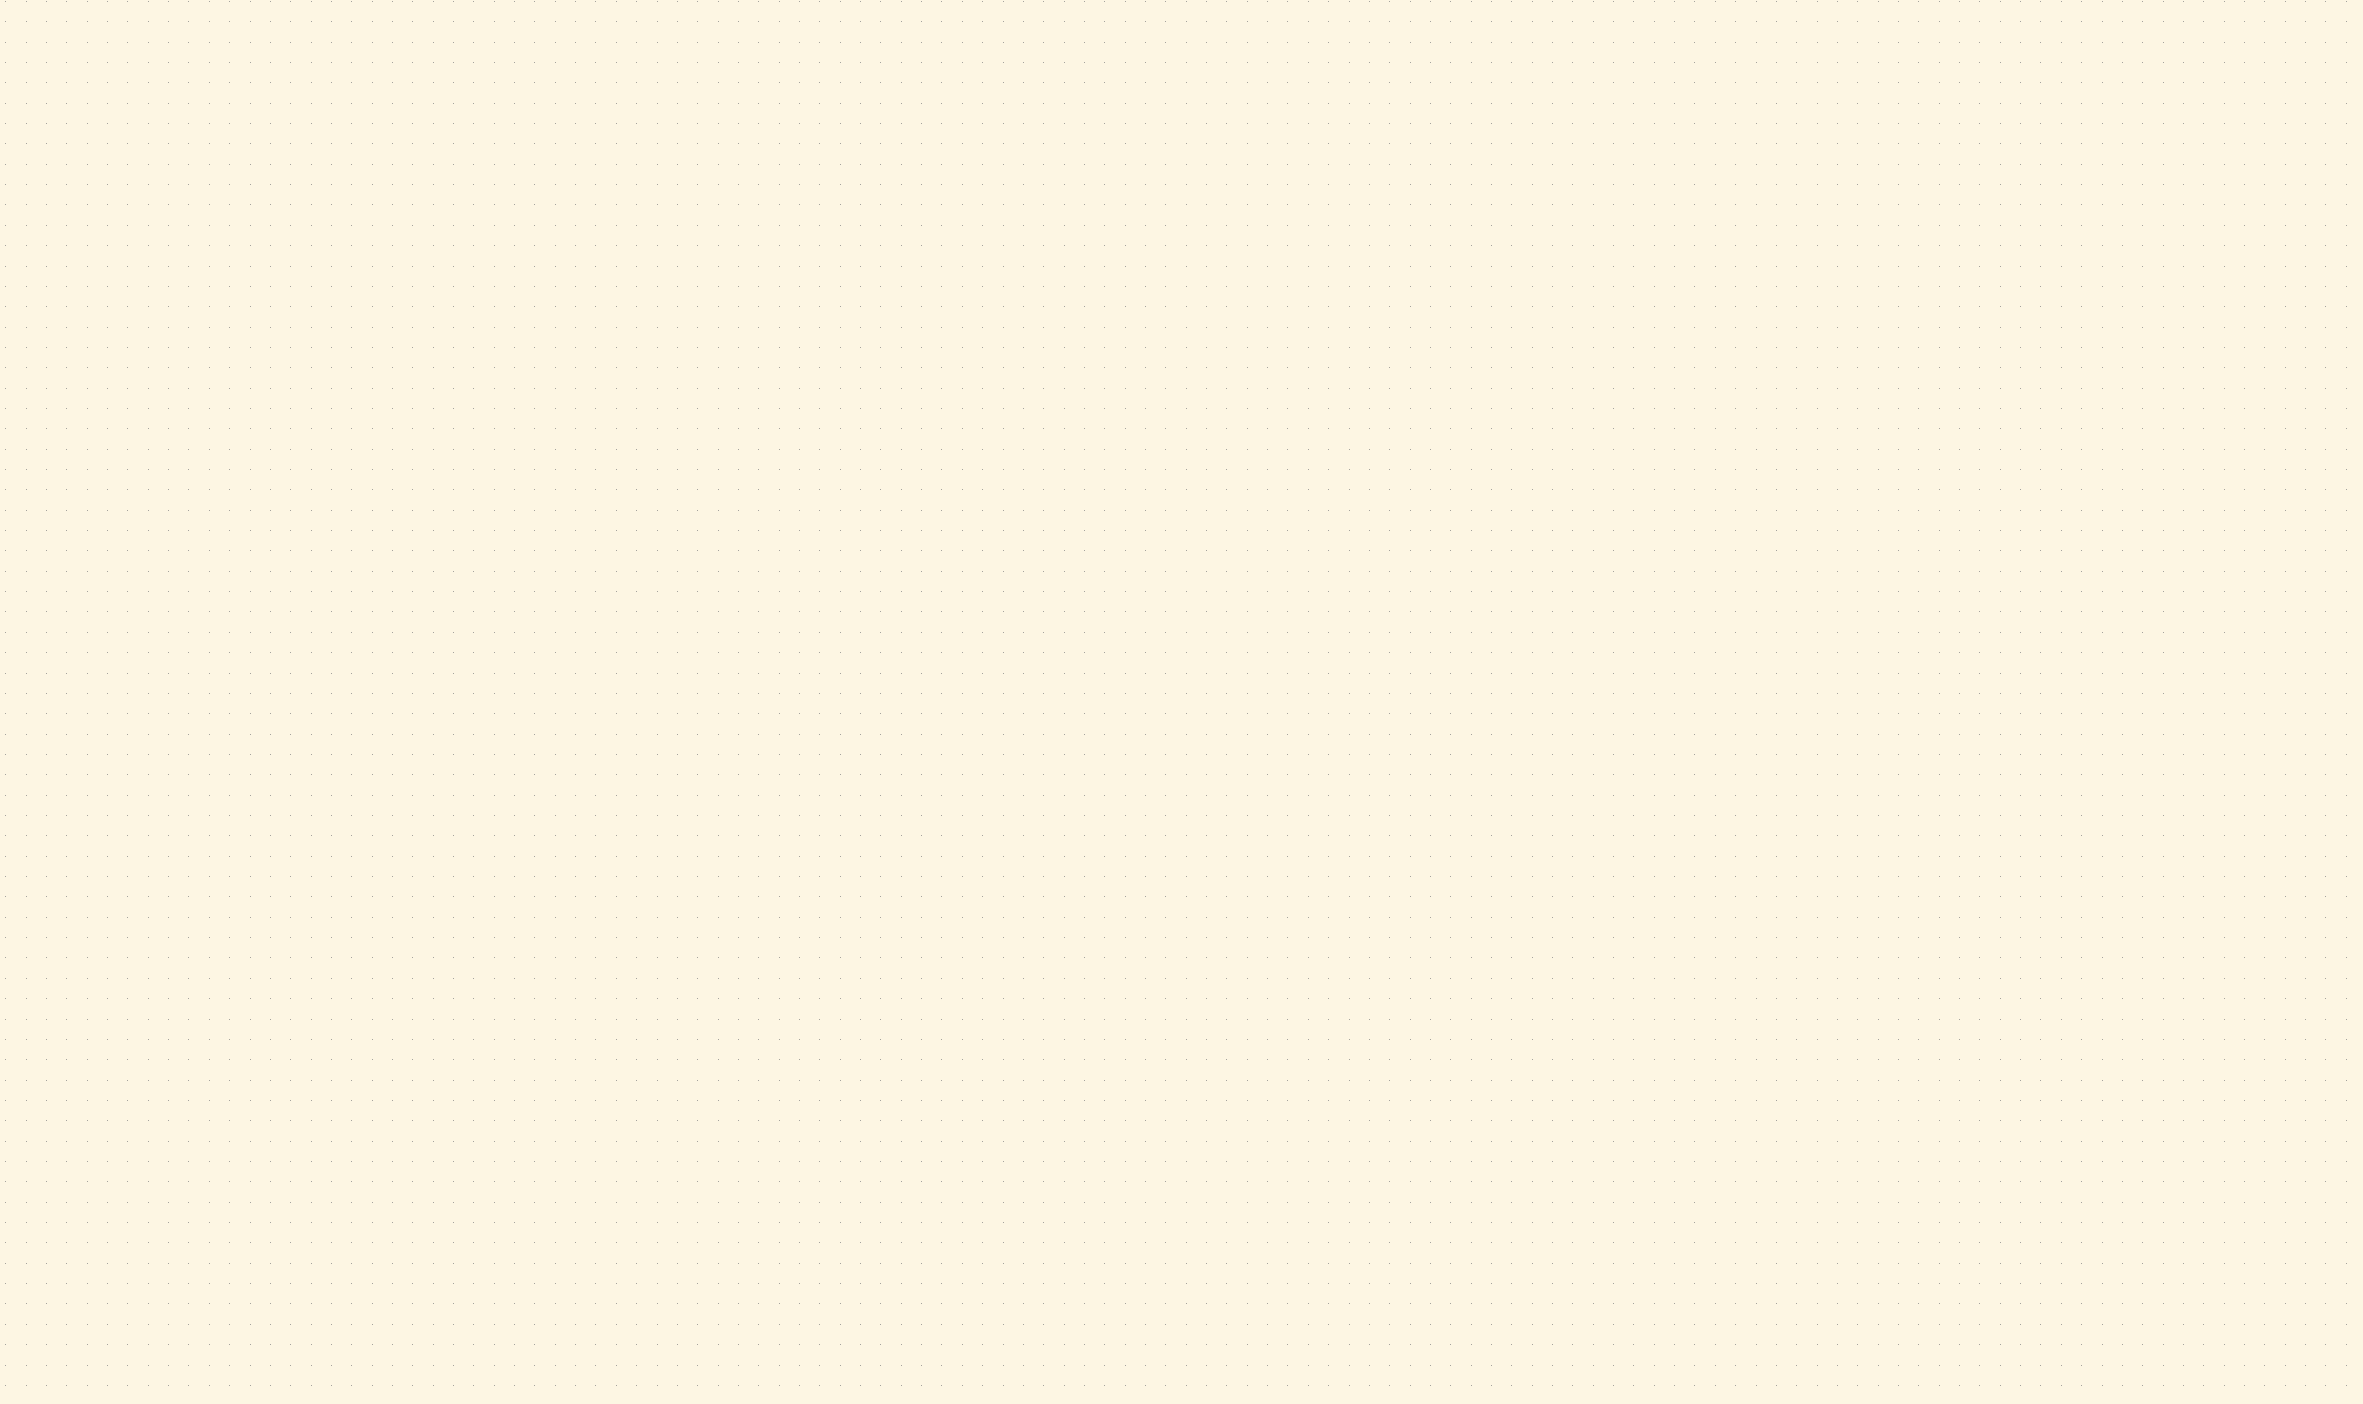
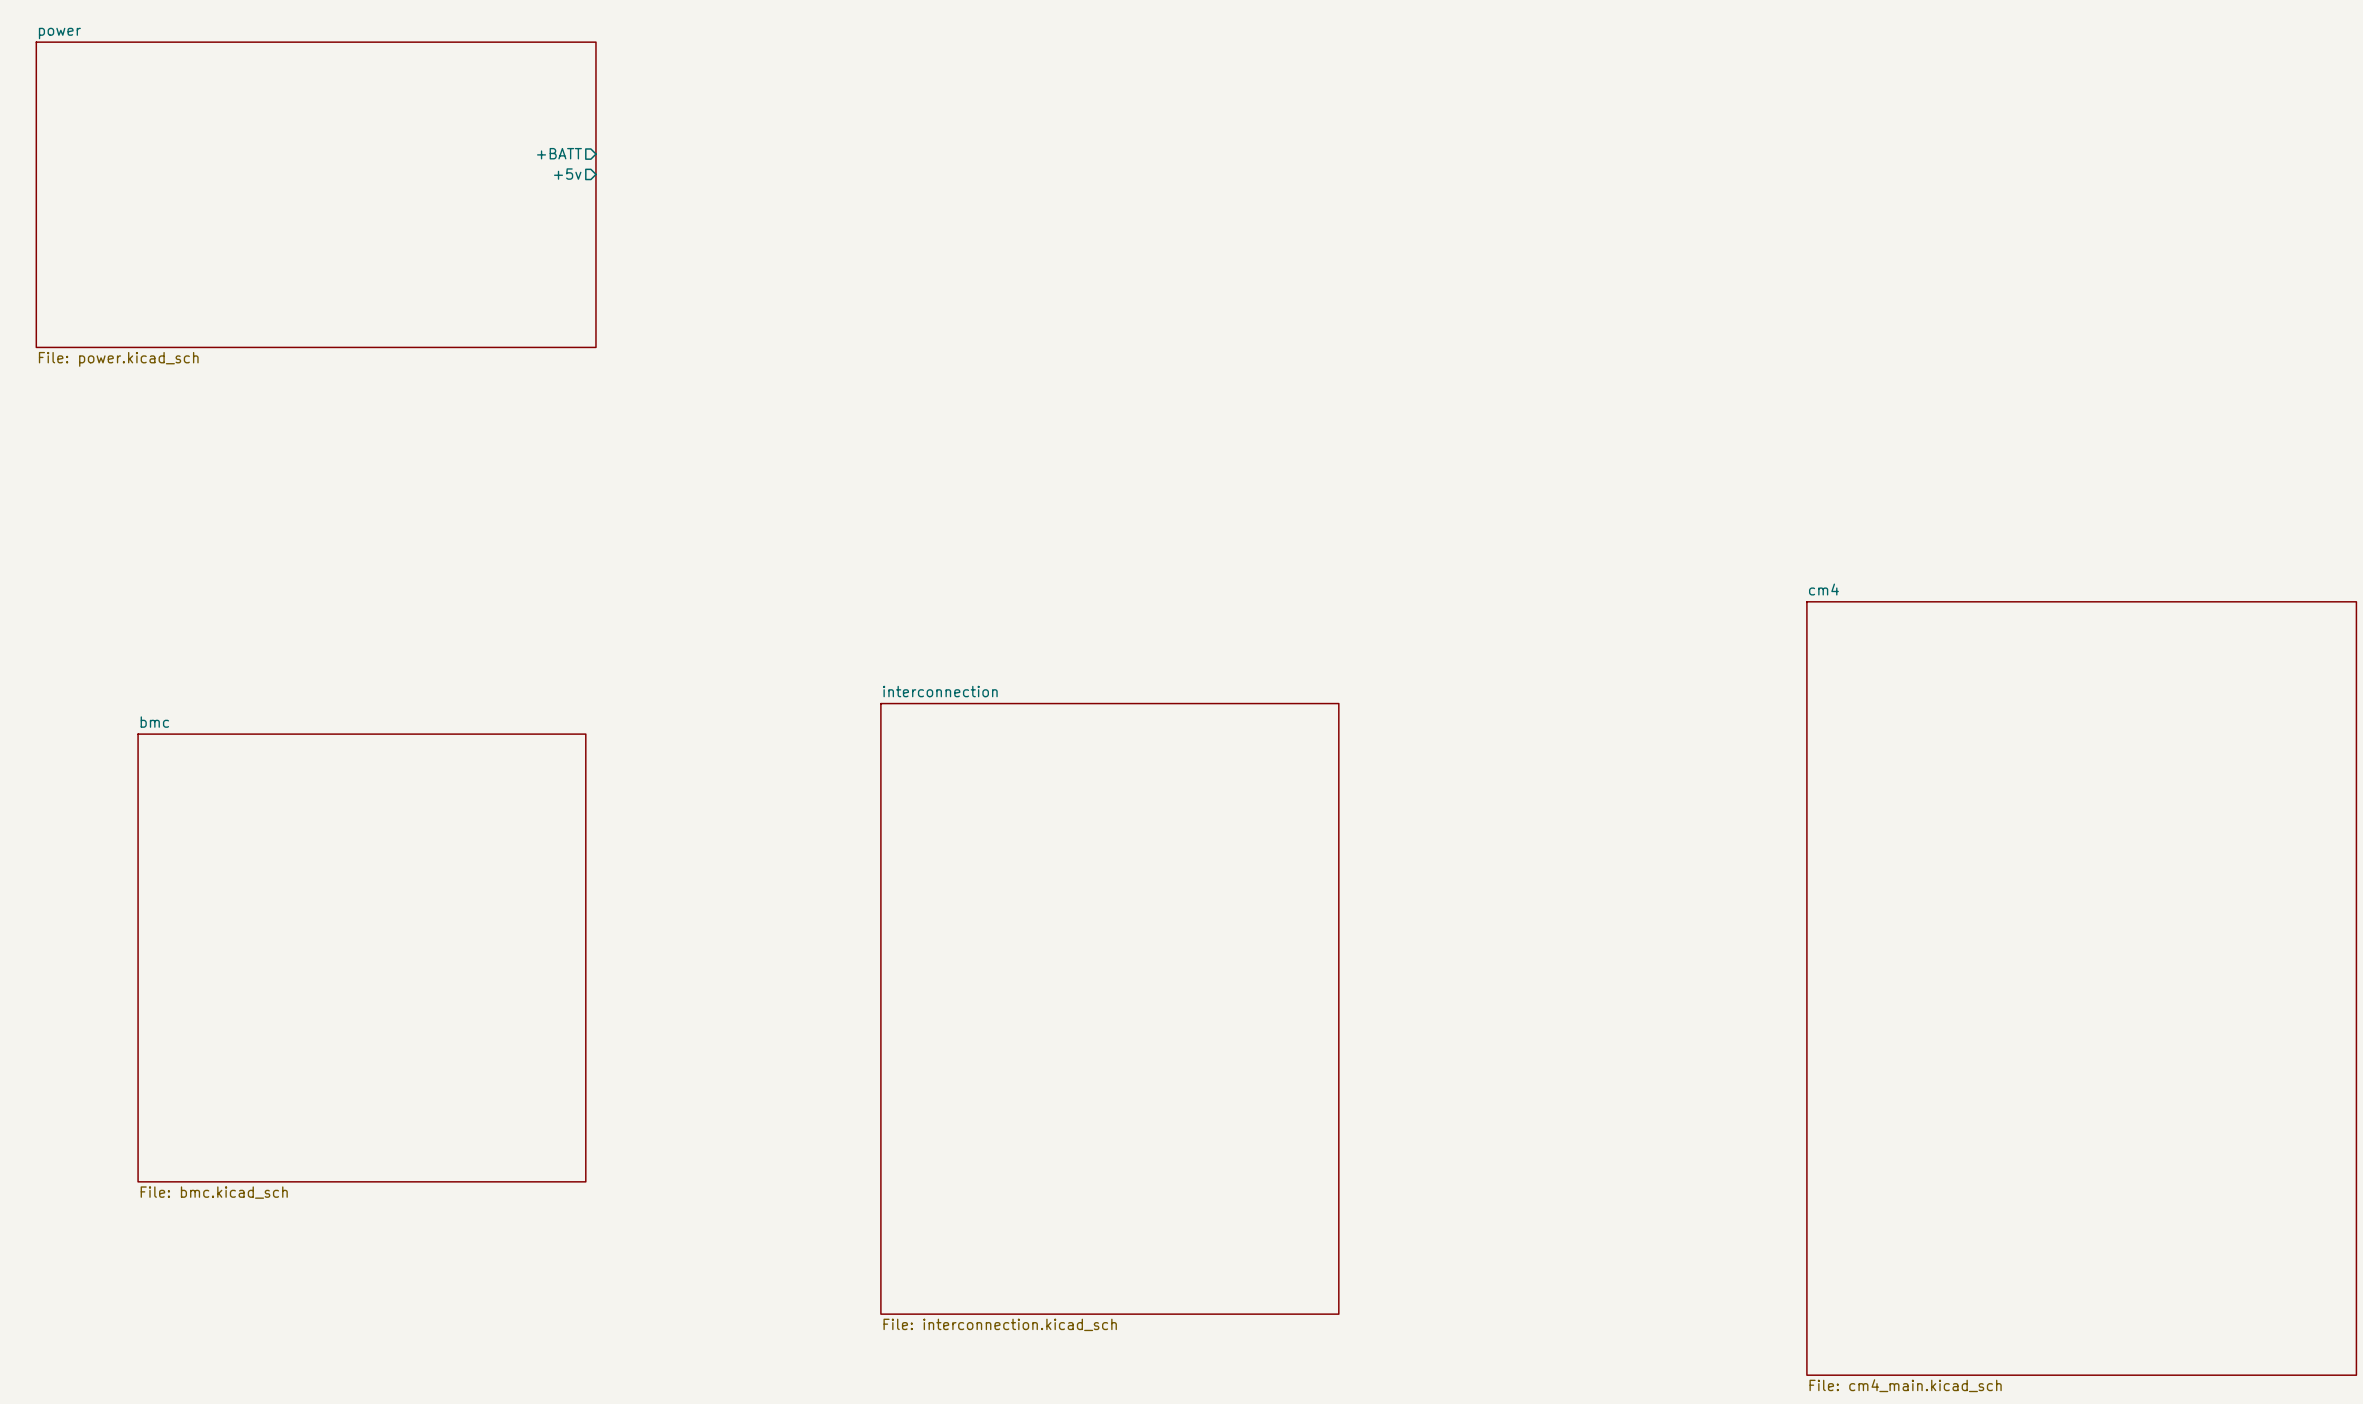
sheet pin: none -> +BATT (559, 153)
sheet pin: none -> +5v (567, 174)
sheet power: none -> File: power.kicad_sch (316, 194)
sheet bmc: none -> File: bmc.kicad_sch (361, 957)
sheet cm4: none -> File: cm4_main.kicad_sch (2081, 988)
sheet interconnection: none -> File: interconnection.kicad_sch (1109, 1008)

